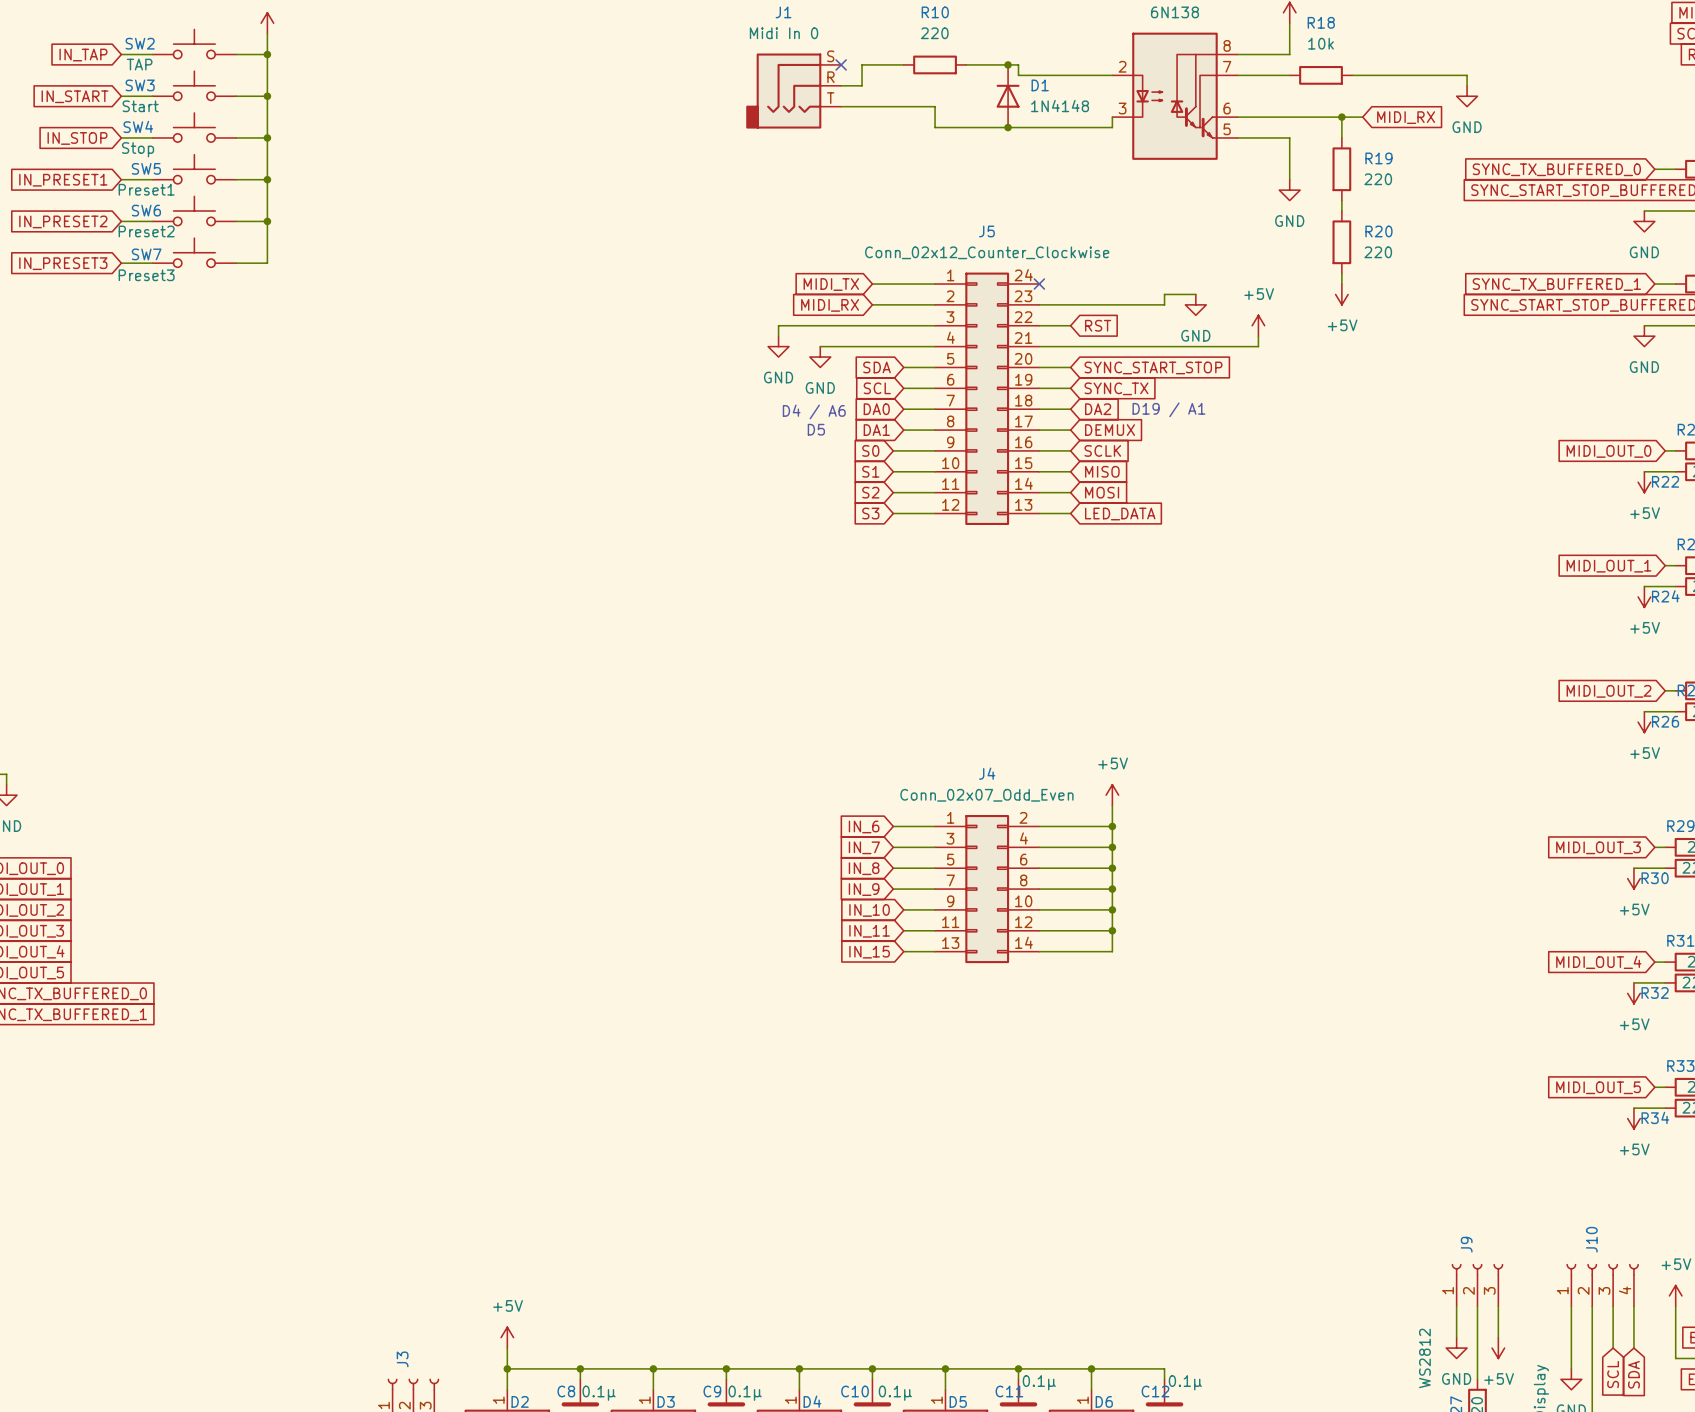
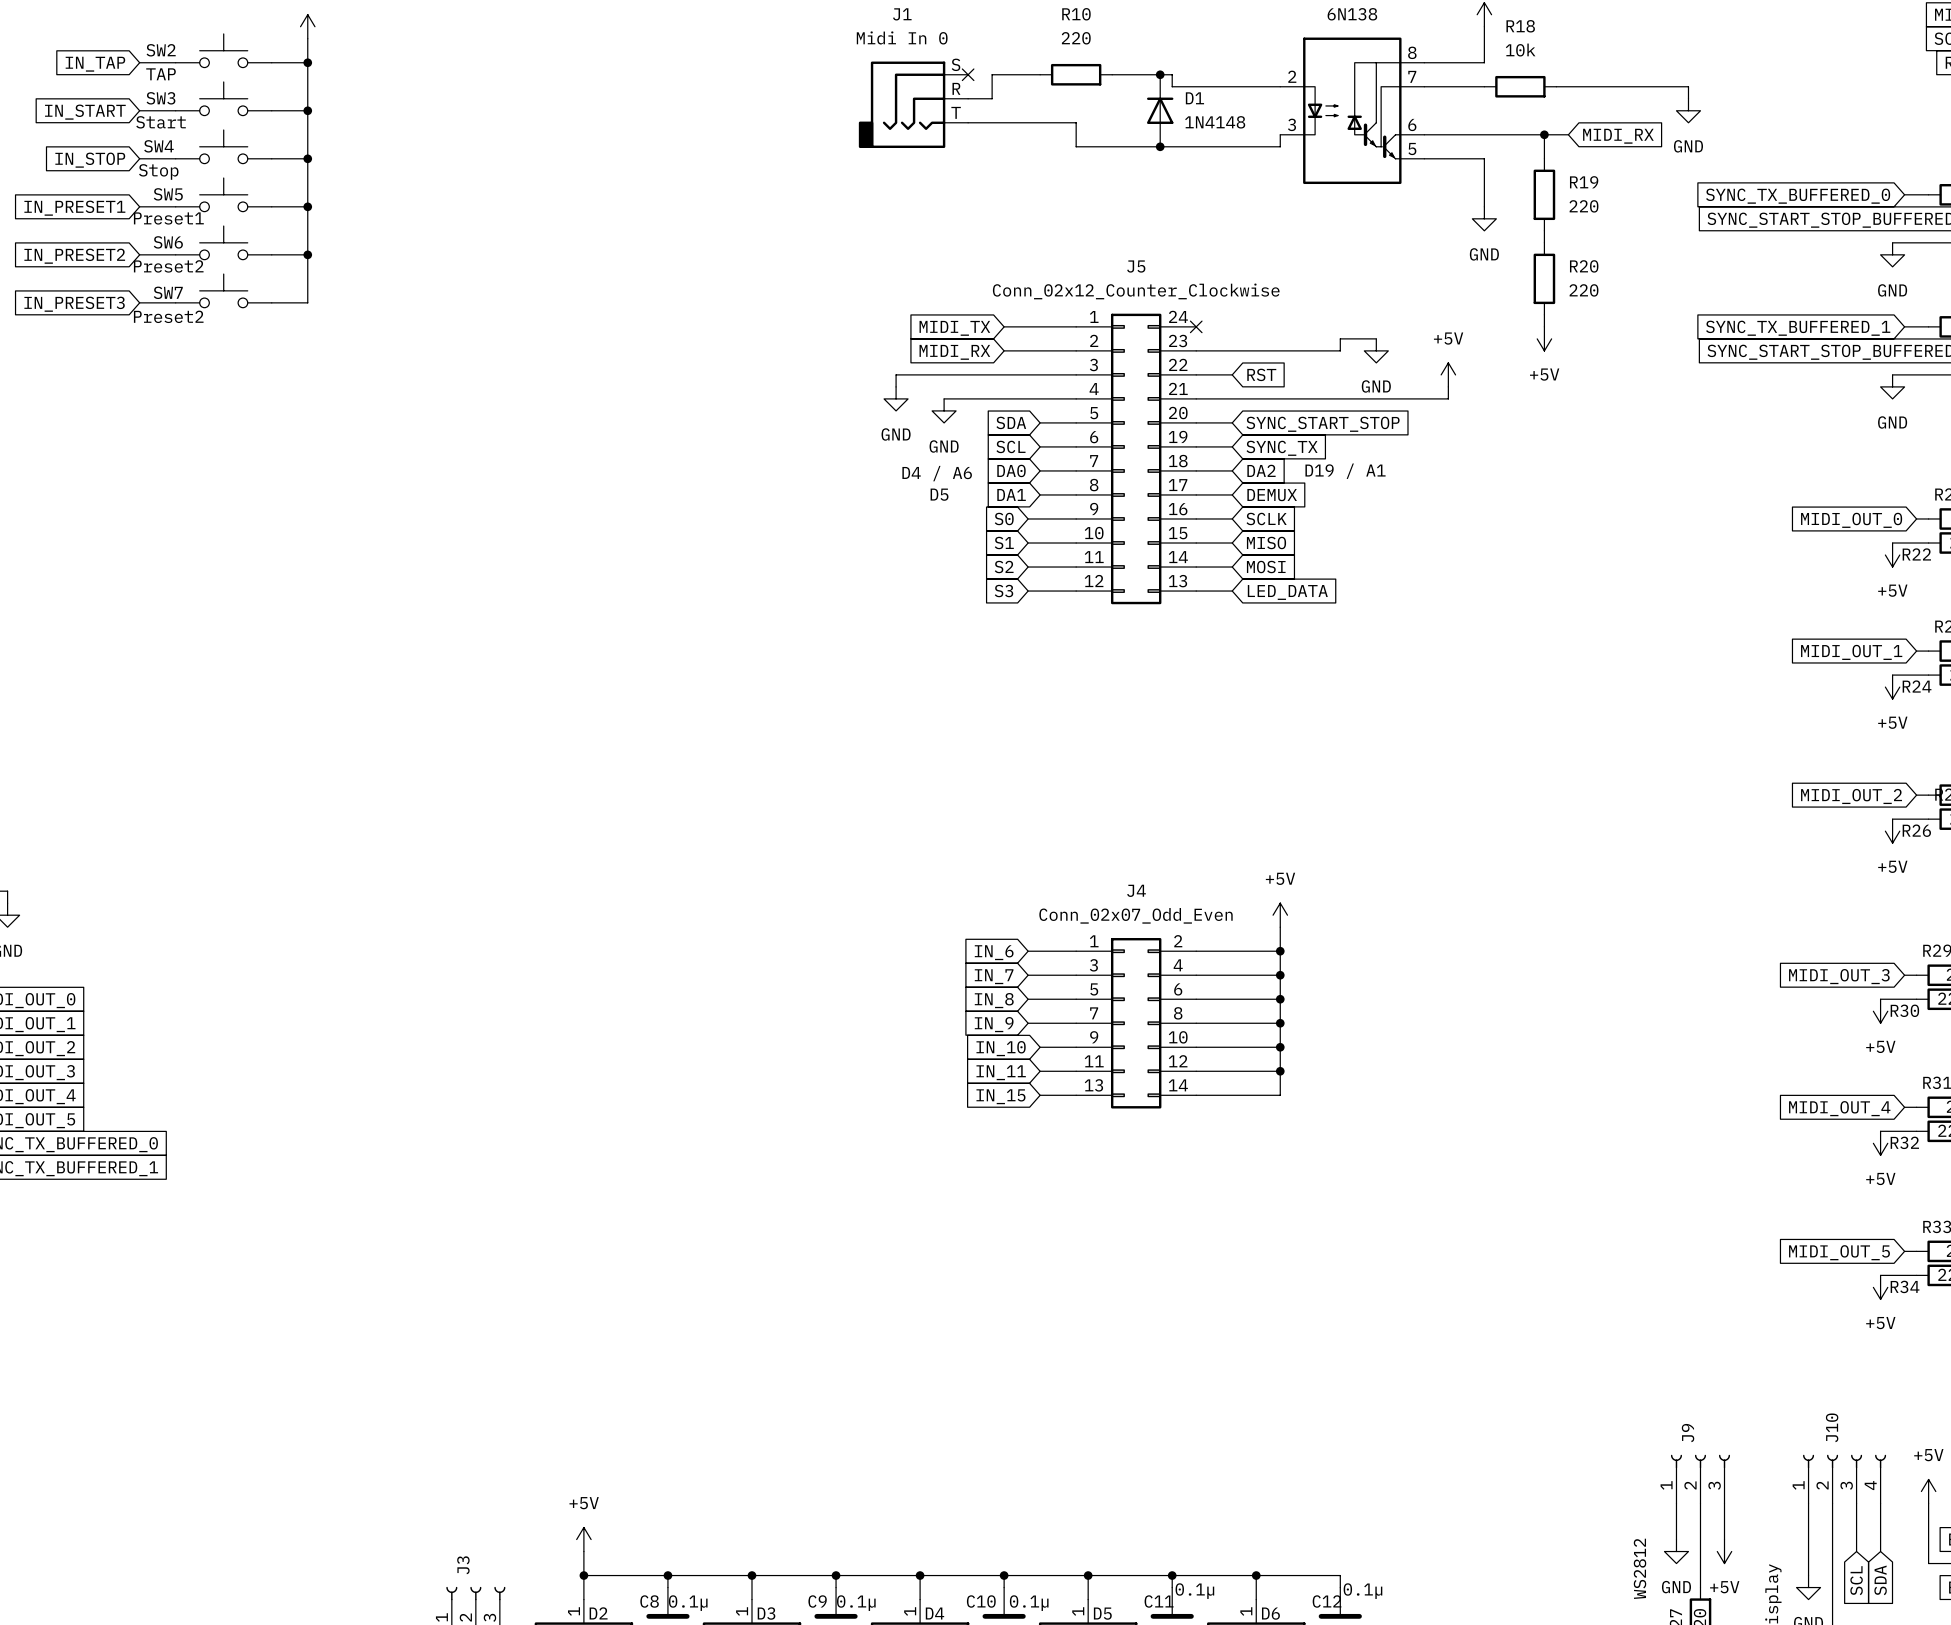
SW7 value: Preset3 (146, 275) -> Preset2 (168, 316)

